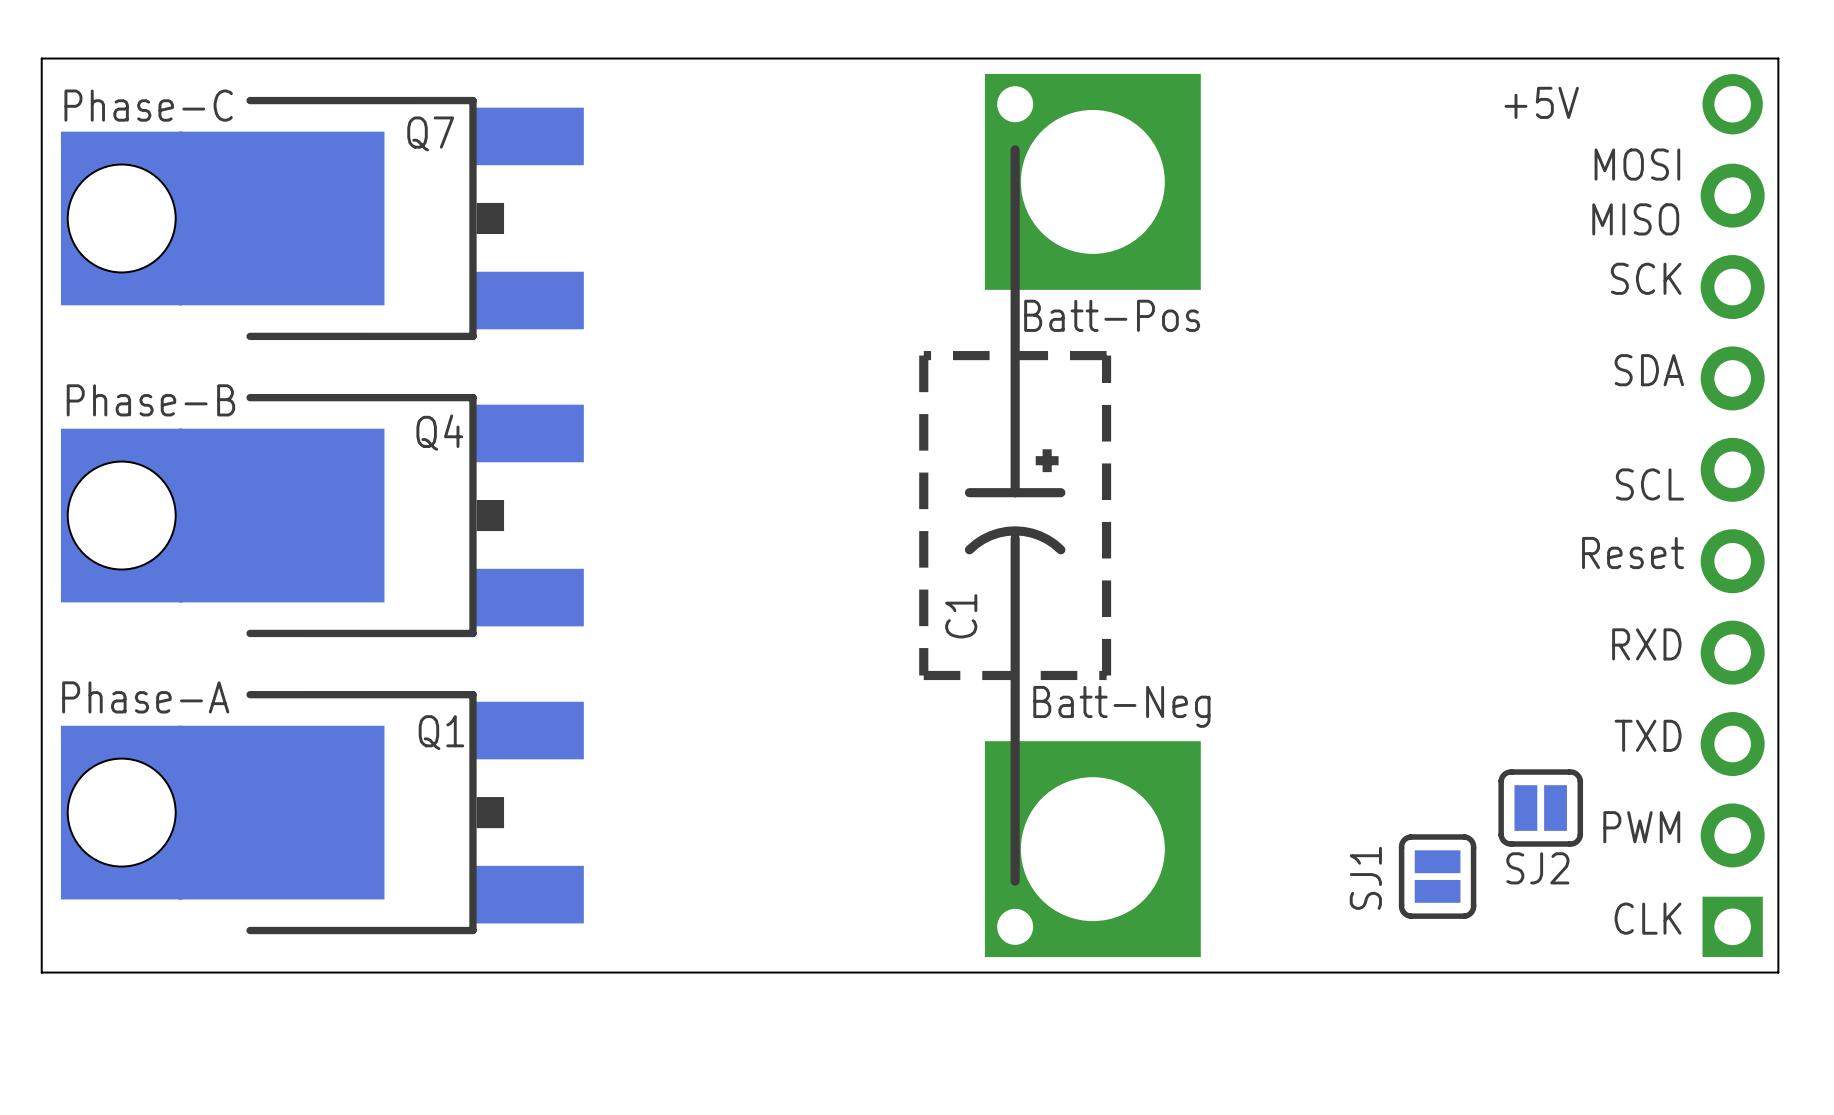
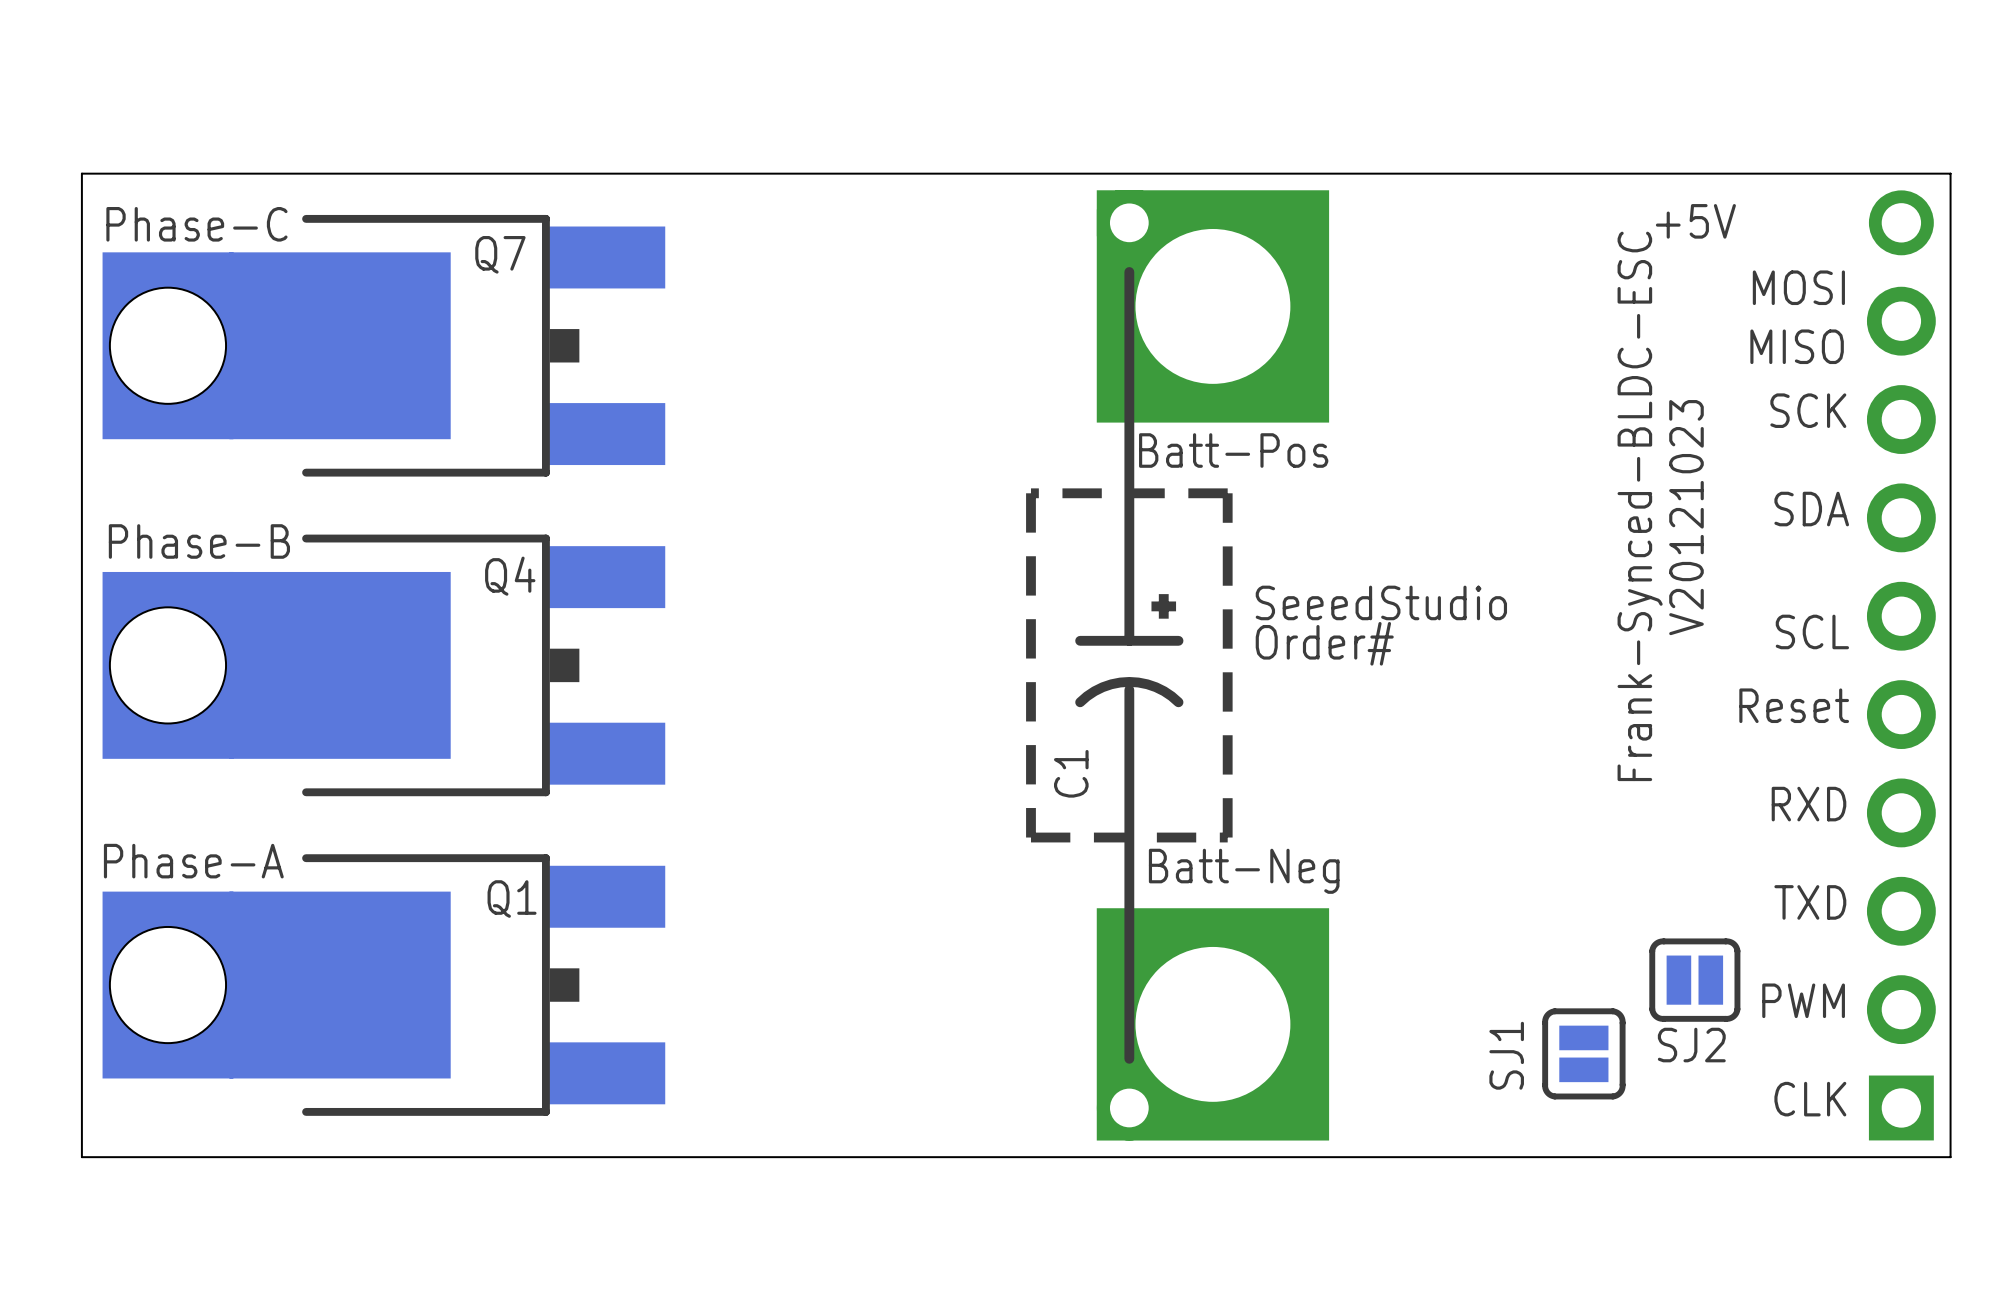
text: none -> Frank-Synced-BLDC-ESC (1640, 506)
text: none -> V20121023 (1686, 517)
text: none -> SeeedStudio (1381, 602)
text: none -> Order# (1324, 643)

